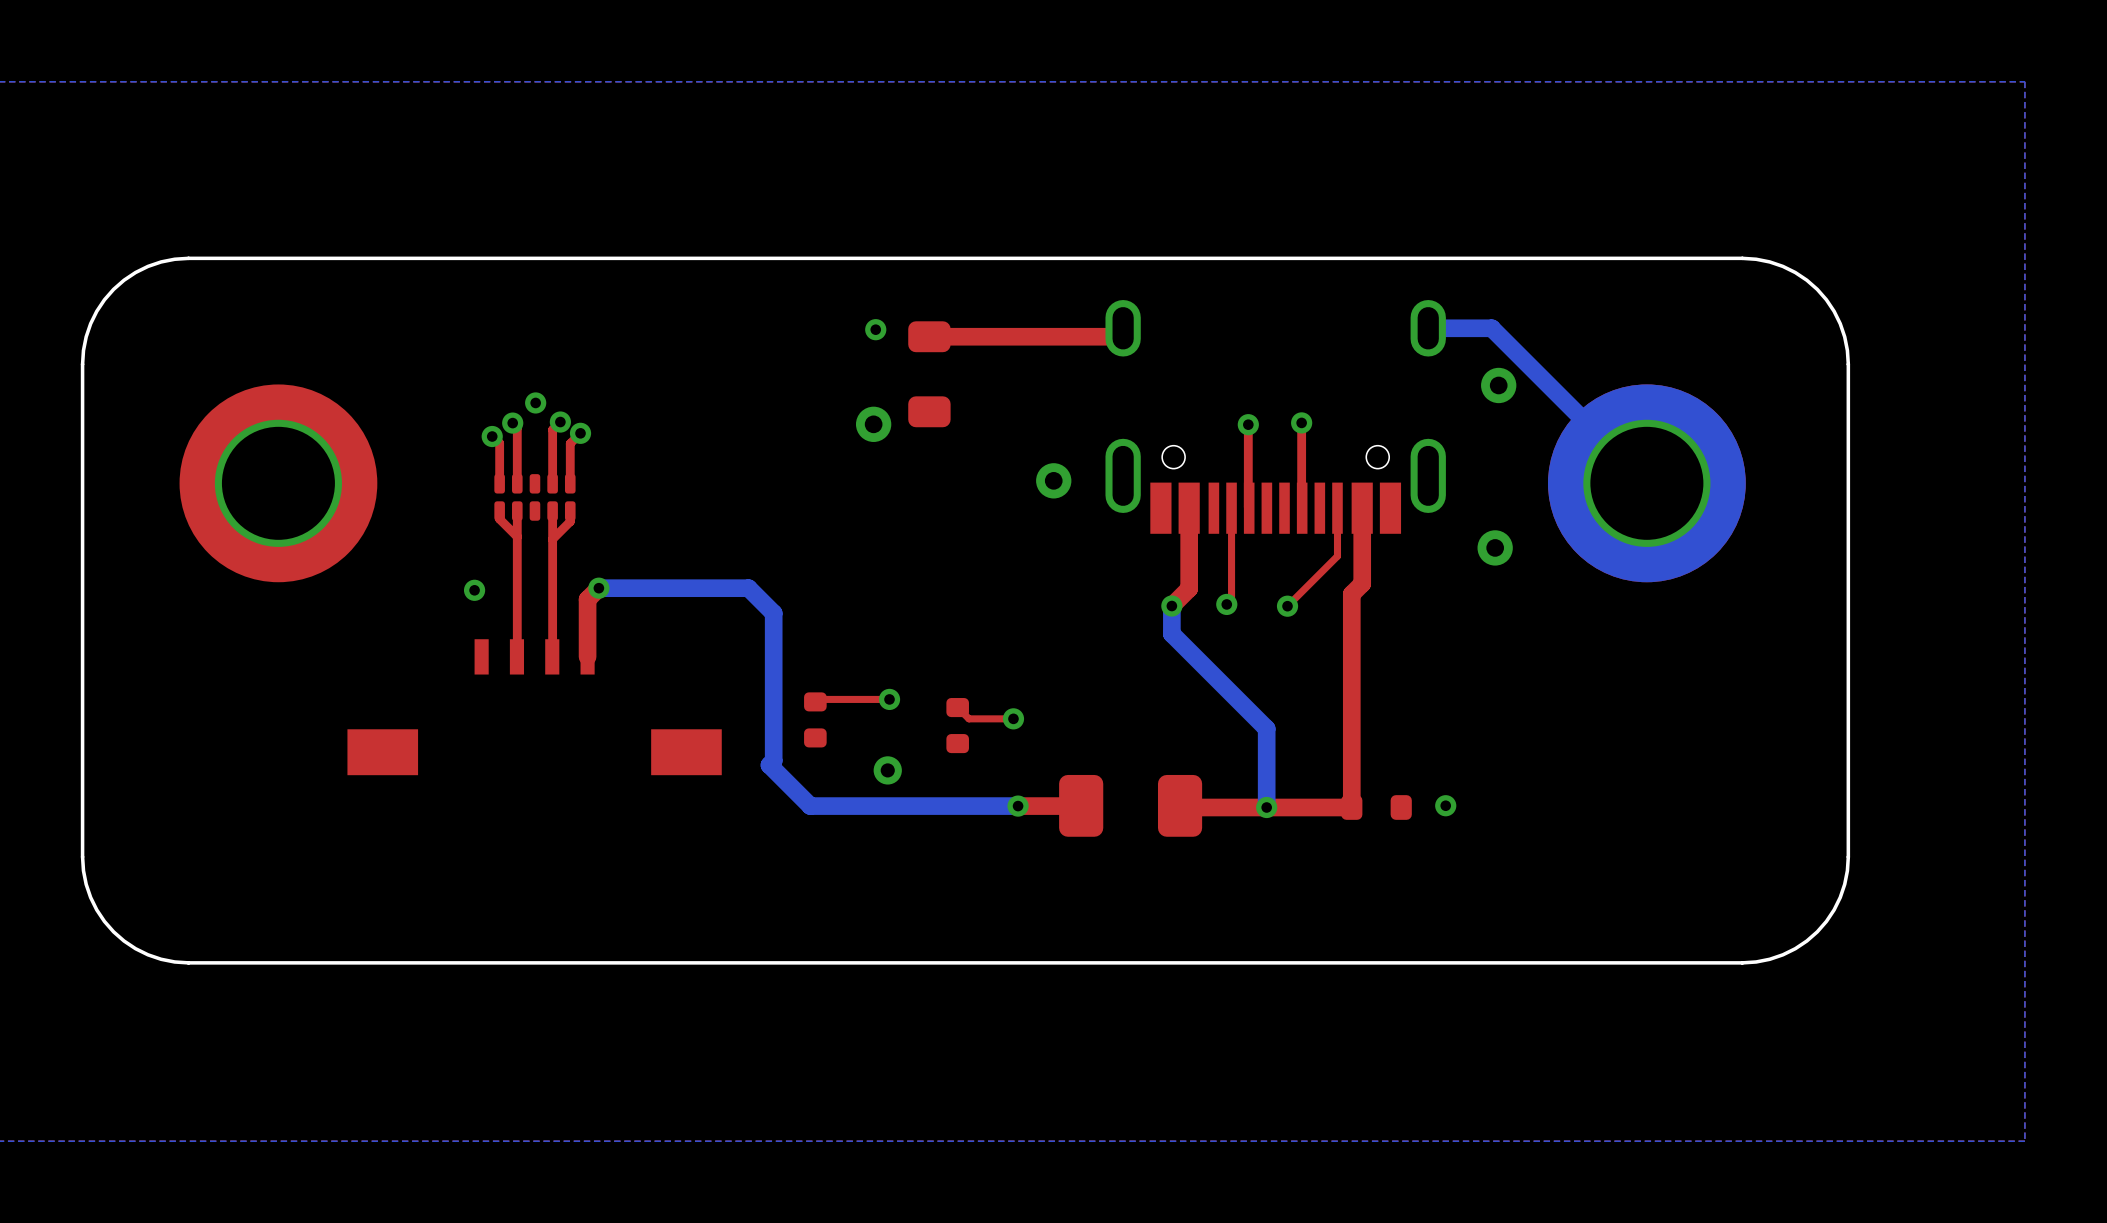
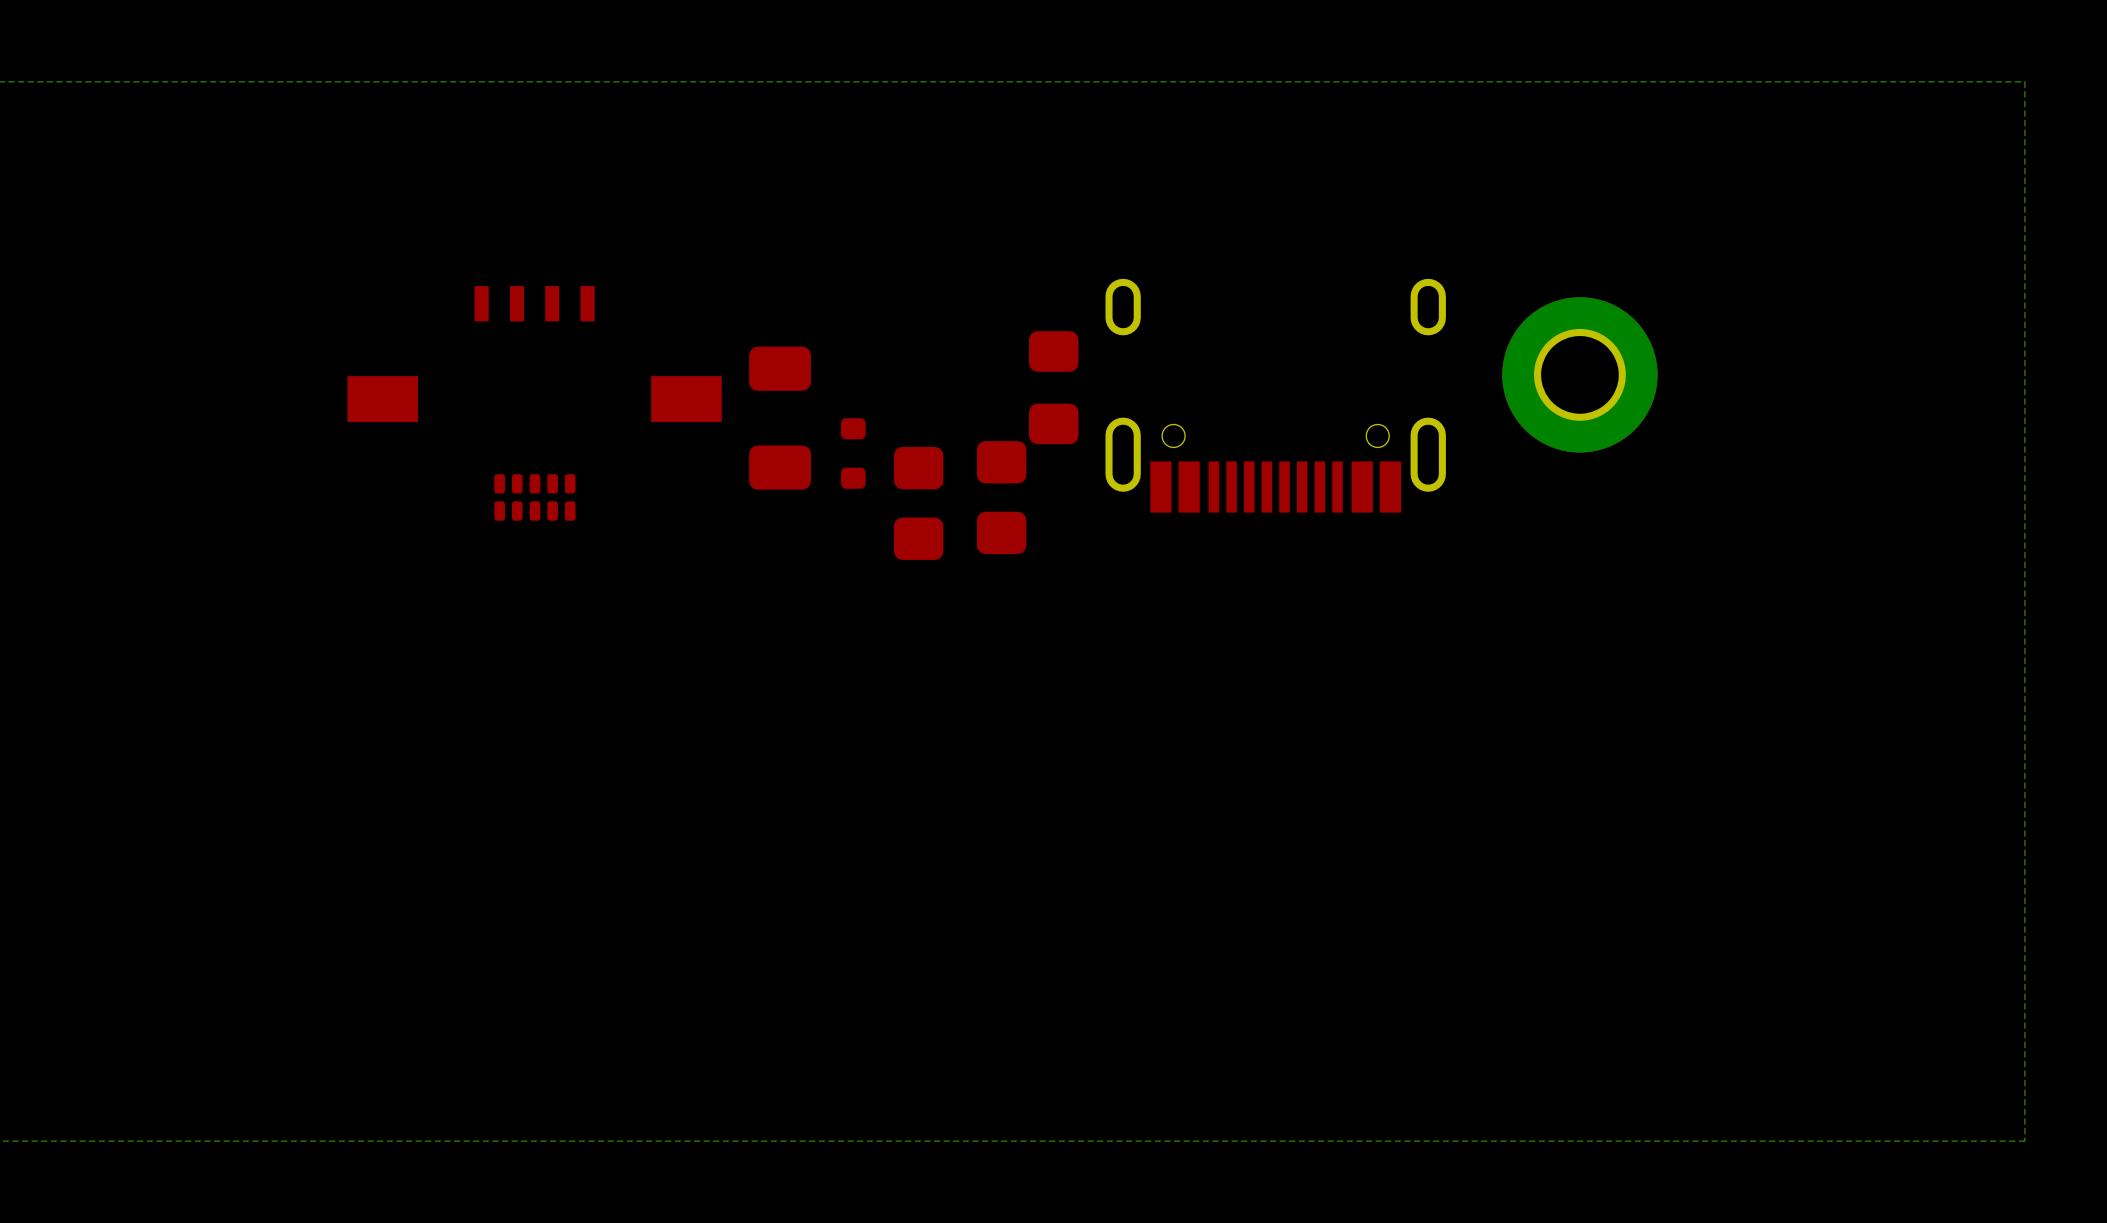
board edge: (1742, 258) (188, 258) (174, 259) (147, 266) (124, 280) (104, 299) (90, 323) (83, 350) (82, 856) (86, 884) (90, 897) (104, 921) (113, 931) (135, 948) (161, 959) (188, 962) (1742, 962) (1769, 959) (1782, 954) (1806, 940) (1826, 921) (1840, 897) (1847, 870) (1848, 364) (1844, 336) (1840, 323) (1834, 311) (1817, 289) (1795, 272) (1782, 266) (1769, 261) (1742, 258) -> none
top track: (1123, 328) (1114, 336) (929, 336) -> none
bottom track: (1428, 328) (1491, 328) (1588, 425) -> none
via: (875, 329) -> none
part: (929, 374) -> none
part: none -> (1579, 374)
via: (1498, 385) -> none
part: none -> (1053, 387)
via: (535, 402) -> none
part position: (1275, 416) -> (1275, 395)
top track: (560, 422) (552, 429) (552, 483) -> none
via: (560, 422) -> none
top track: (1301, 422) (1302, 508) -> none
via: (1301, 422) -> none
top track: (512, 423) (517, 427) (517, 483) -> none
via: (512, 423) -> none
via: (873, 424) -> none
via: (1248, 424) -> none
top track: (1249, 425) (1249, 508) -> none
top track: (580, 433) (570, 443) (570, 483) -> none
via: (580, 433) -> none
top track: (492, 436) (499, 443) (499, 483) -> none
via: (492, 436) -> none
via: (1053, 480) -> none
part: (278, 483) -> none
part: (1646, 483) -> none
part: none -> (1001, 497)
part: none -> (918, 503)
top track: (1189, 508) (1189, 588) (1171, 606) -> none
top track: (1231, 508) (1231, 599) (1226, 604) -> none
top track: (1337, 508) (1337, 556) (1287, 606) -> none
top track: (1362, 508) (1362, 583) (1351, 594) (1351, 807) (1181, 807) (1180, 805) -> none
top track: (499, 511) (499, 519) (517, 536) -> none
top track: (517, 511) (517, 656) -> none
top track: (552, 511) (552, 656) -> none
top track: (570, 511) (570, 521) (552, 539) -> none
via: (1495, 547) -> none
top track: (598, 588) (587, 599) (587, 656) -> none
bottom track: (598, 588) (748, 588) (773, 613) (773, 760) (769, 765) (810, 806) (1018, 806) -> none
via: (598, 588) -> none
via: (474, 590) -> none
via: (1226, 604) -> none
bottom track: (1171, 606) (1171, 633) (1266, 728) (1266, 807) -> none
via: (1171, 606) -> none
via: (1287, 606) -> none
top track: (889, 699) (817, 699) (815, 701) -> none
via: (889, 699) -> none
part position: (534, 707) -> (534, 354)
top track: (957, 707) (968, 718) (1013, 718) -> none
via: (1013, 718) -> none
part: (815, 719) -> none
part: (957, 725) -> none
via: (887, 770) -> none
part rotation: 0° (1130, 805) -> 90° clockwise (780, 418)
part position: (1130, 805) -> (780, 418)
via: (1445, 805) -> none
via: (1018, 806) -> none
top track: (1080, 806) (1018, 806) -> none
via: (1266, 807) -> none
part rotation: 0° (1376, 807) -> 90° clockwise (853, 453)
part position: (1376, 807) -> (853, 453)

